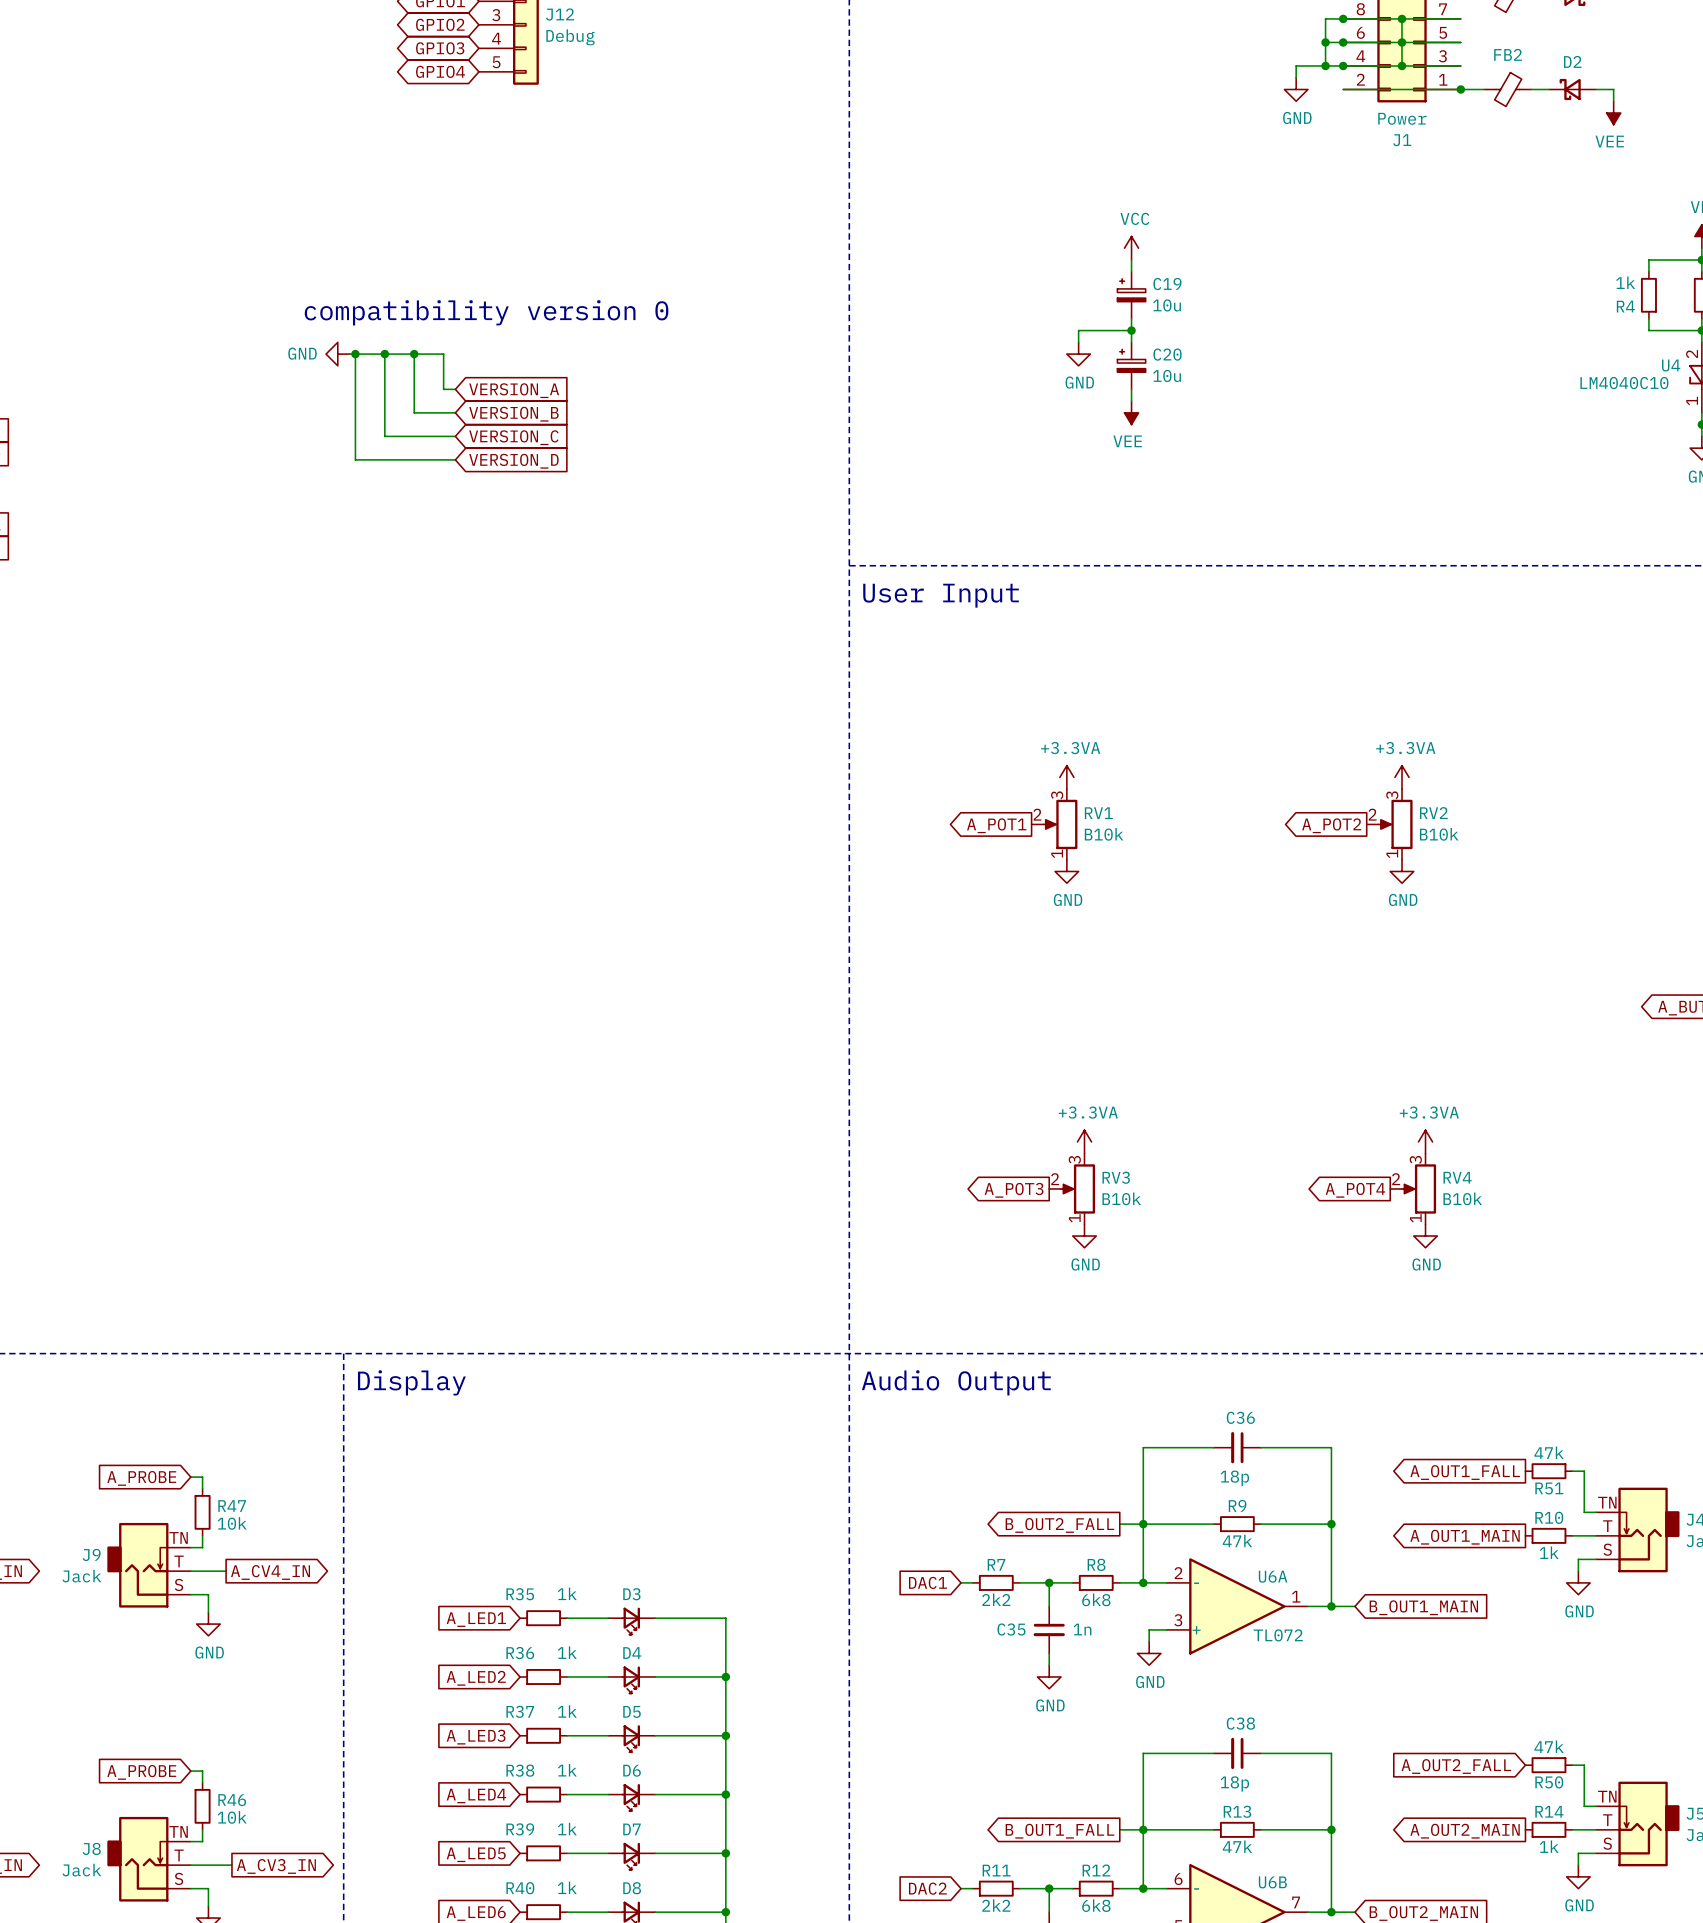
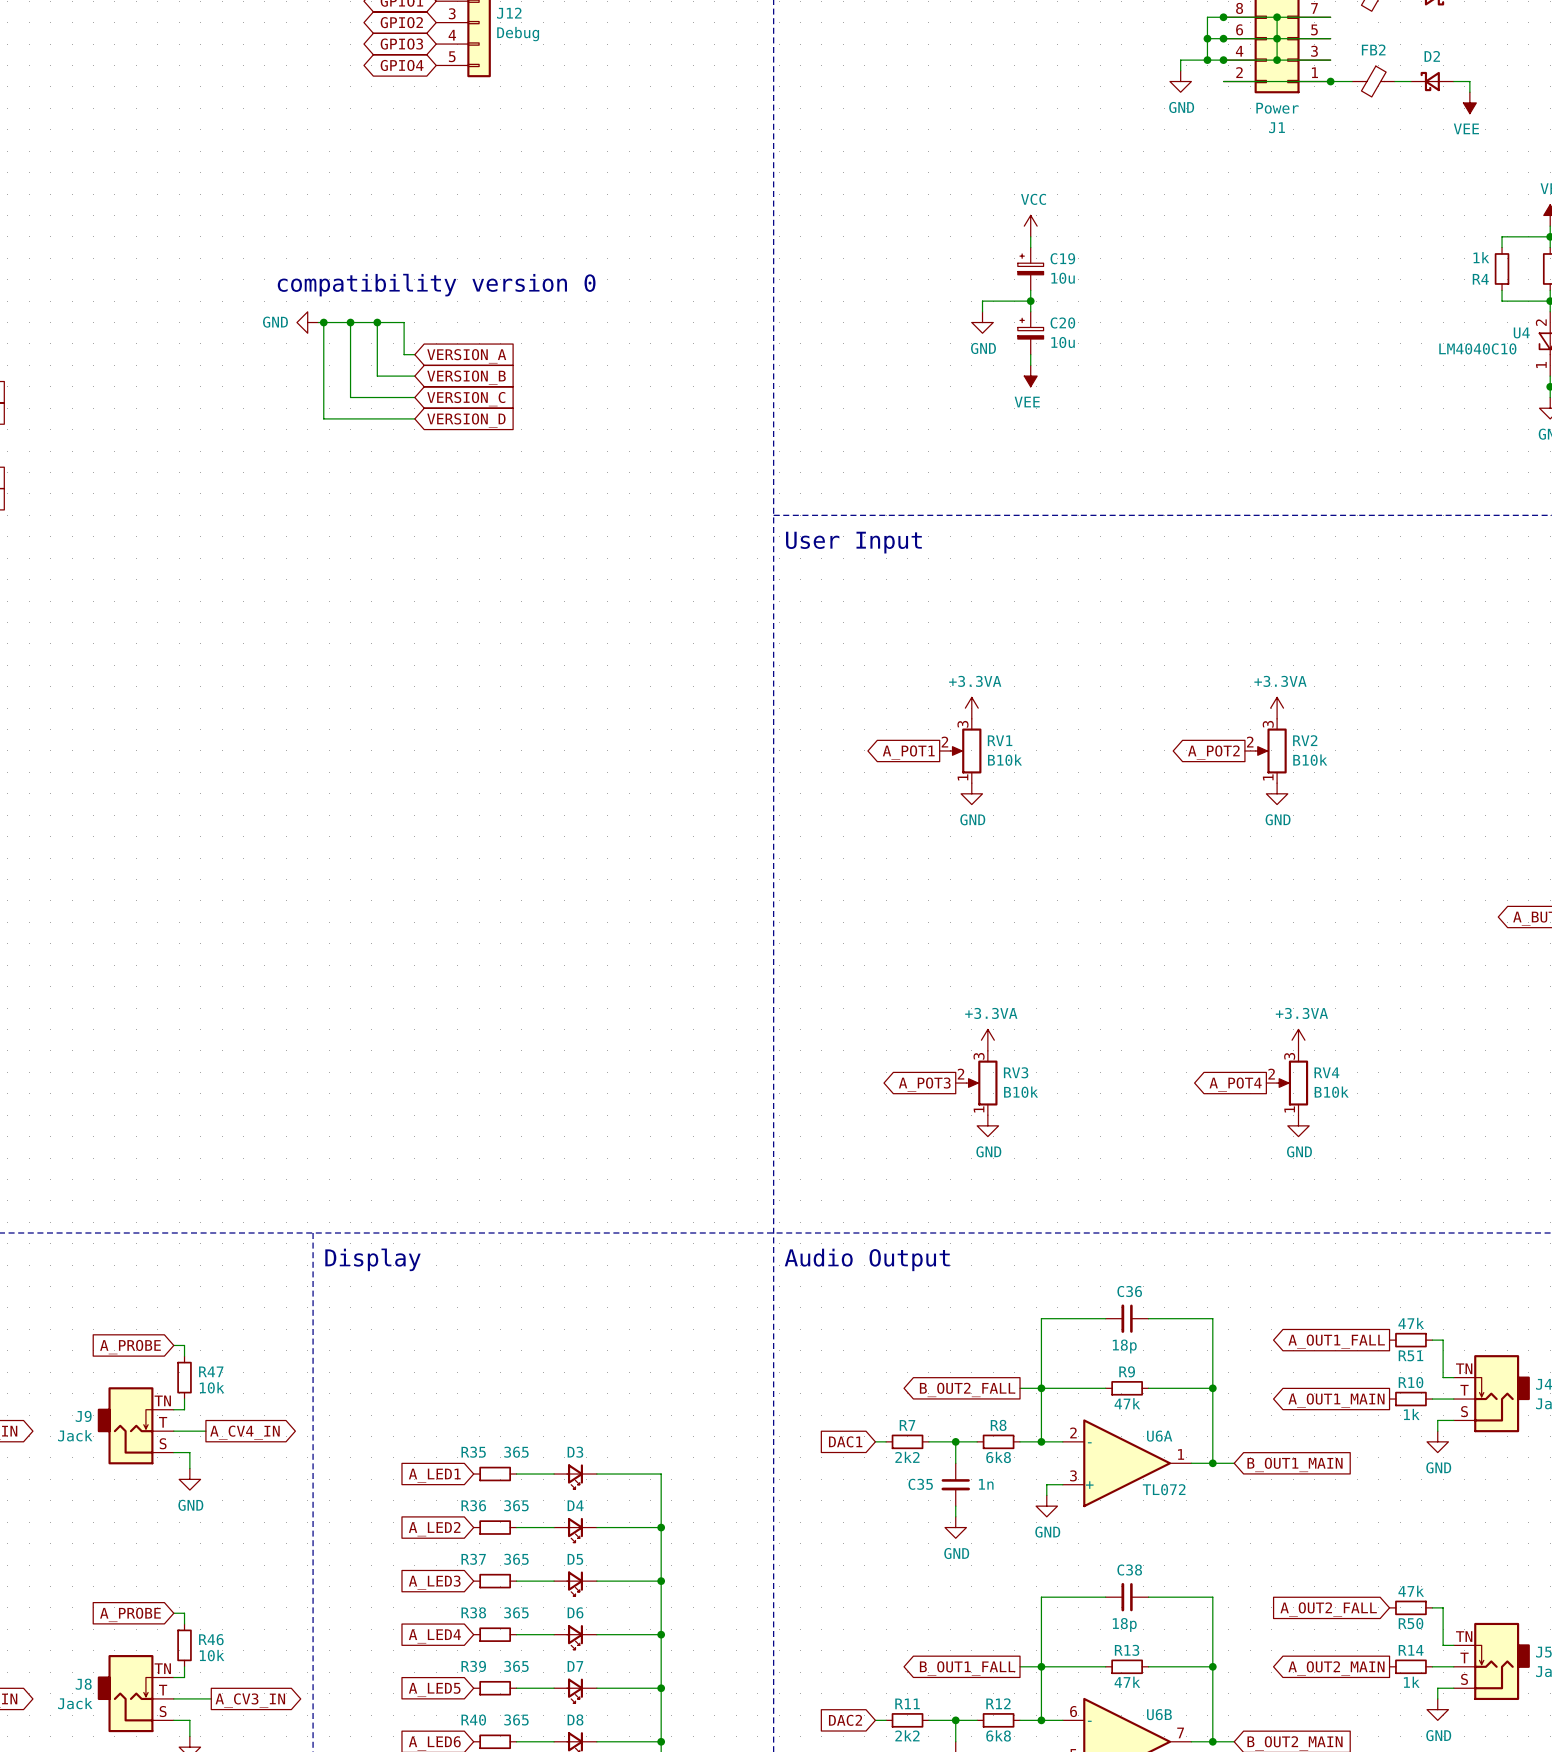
R35 value: 1k (567, 1593) -> 365 (516, 1452)
R36 value: 1k (567, 1652) -> 365 (516, 1505)
R37 value: 1k (567, 1711) -> 365 (516, 1559)
R38 value: 1k (567, 1770) -> 365 (516, 1612)
R39 value: 1k (567, 1829) -> 365 (516, 1666)
R40 value: 1k (567, 1887) -> 365 (516, 1719)

